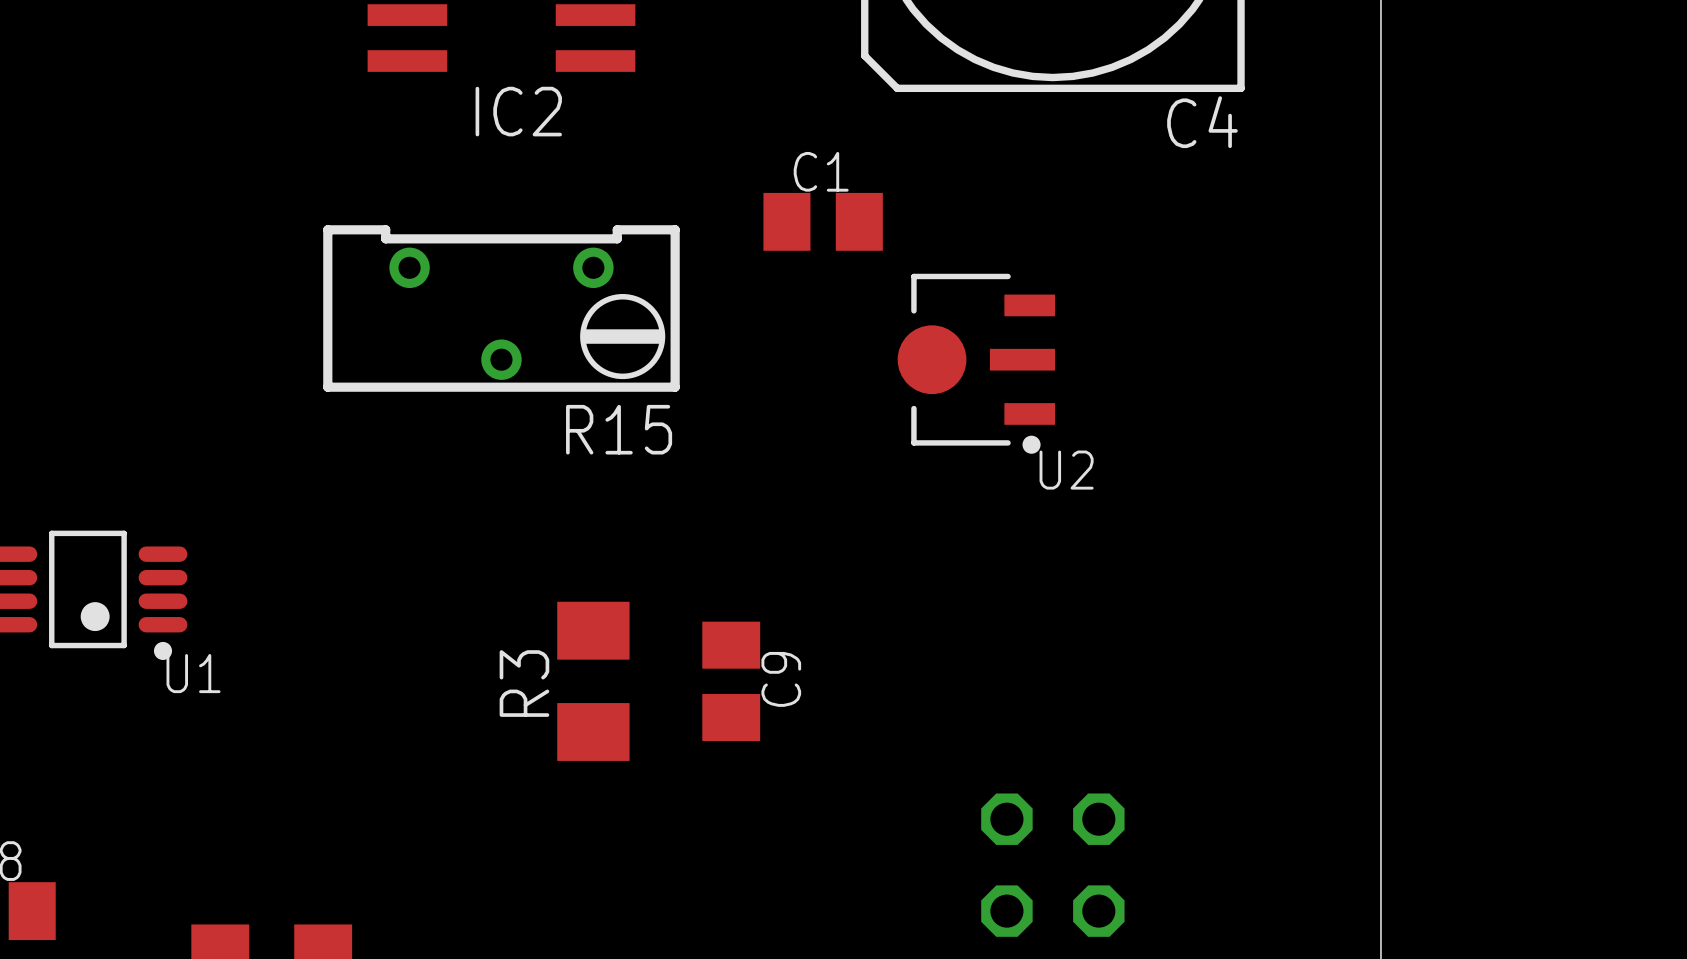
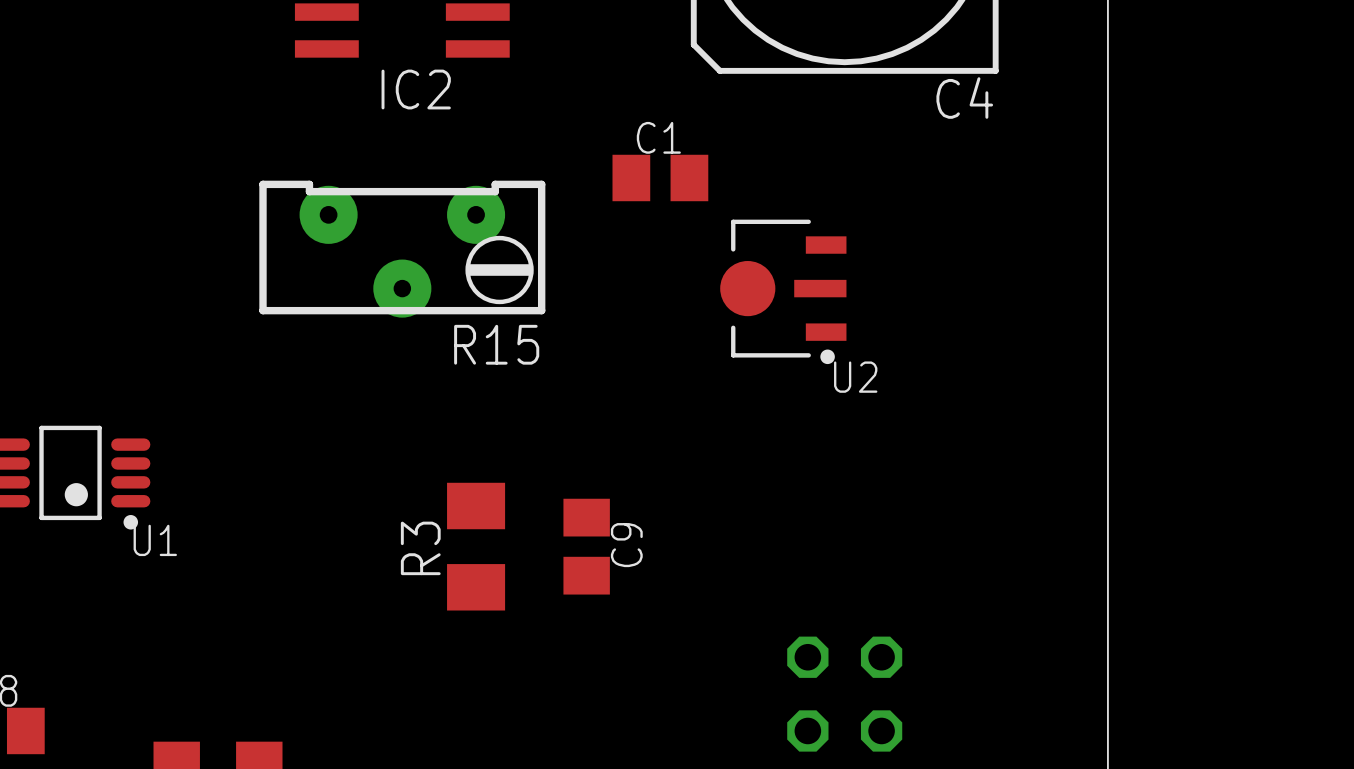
R15 footprint: [323, 225, 680, 392] -> [259, 180, 546, 318]

